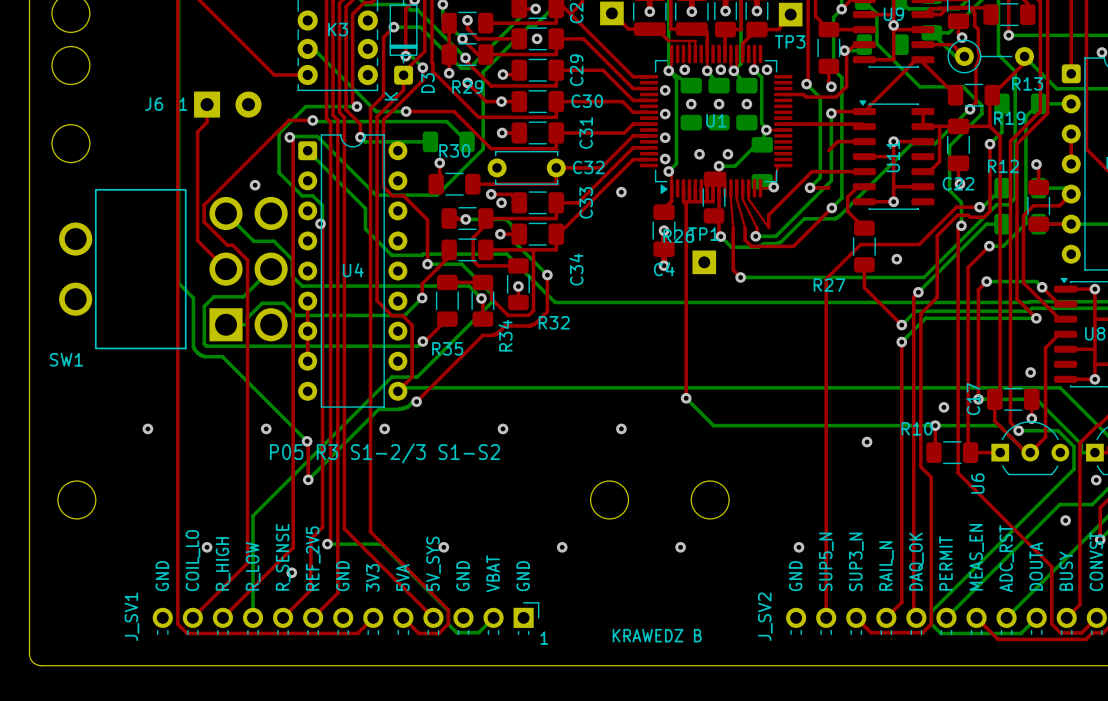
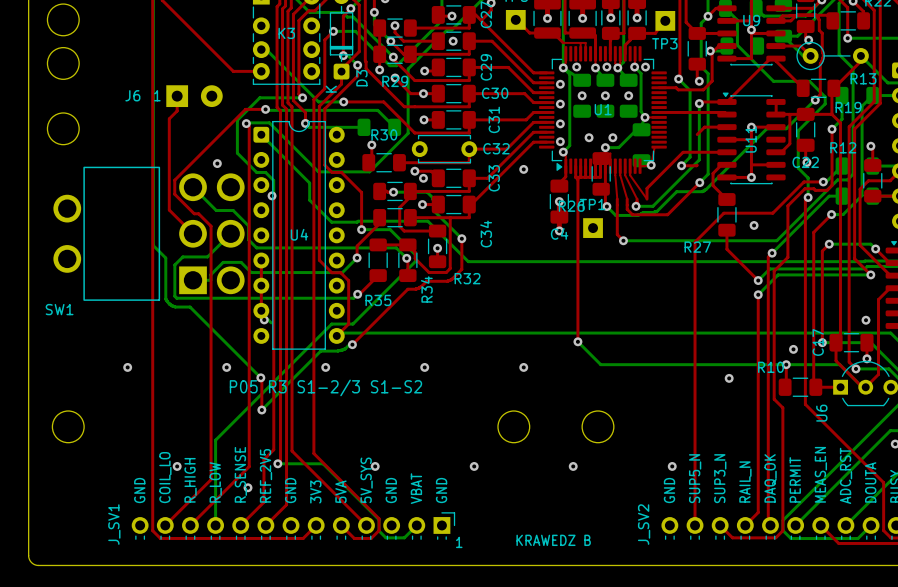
bottom track: none -> (264, 319) (268, 319) (271, 322)
via: none -> (264, 319)

